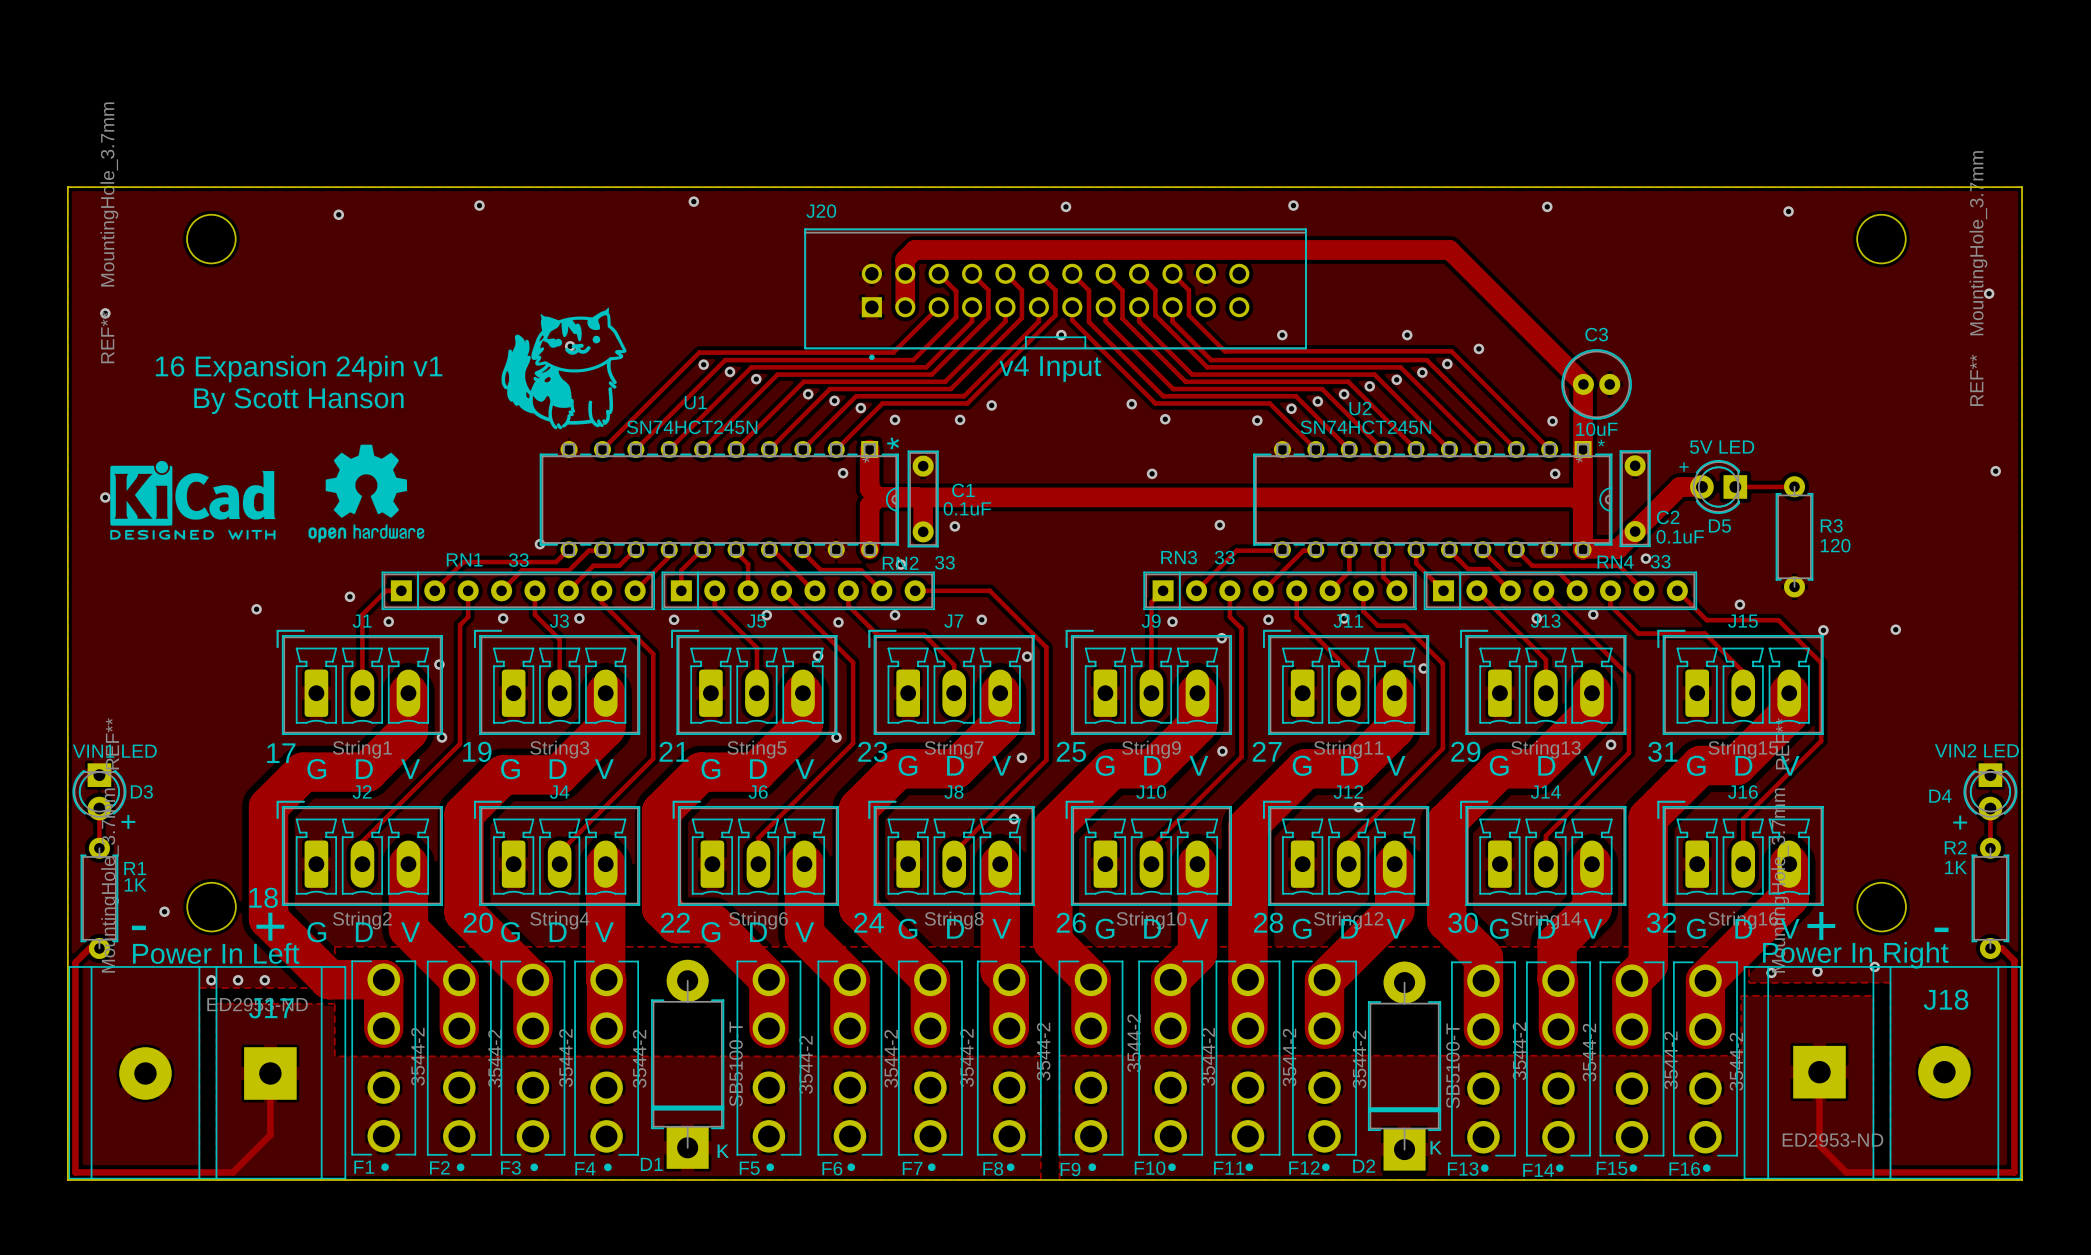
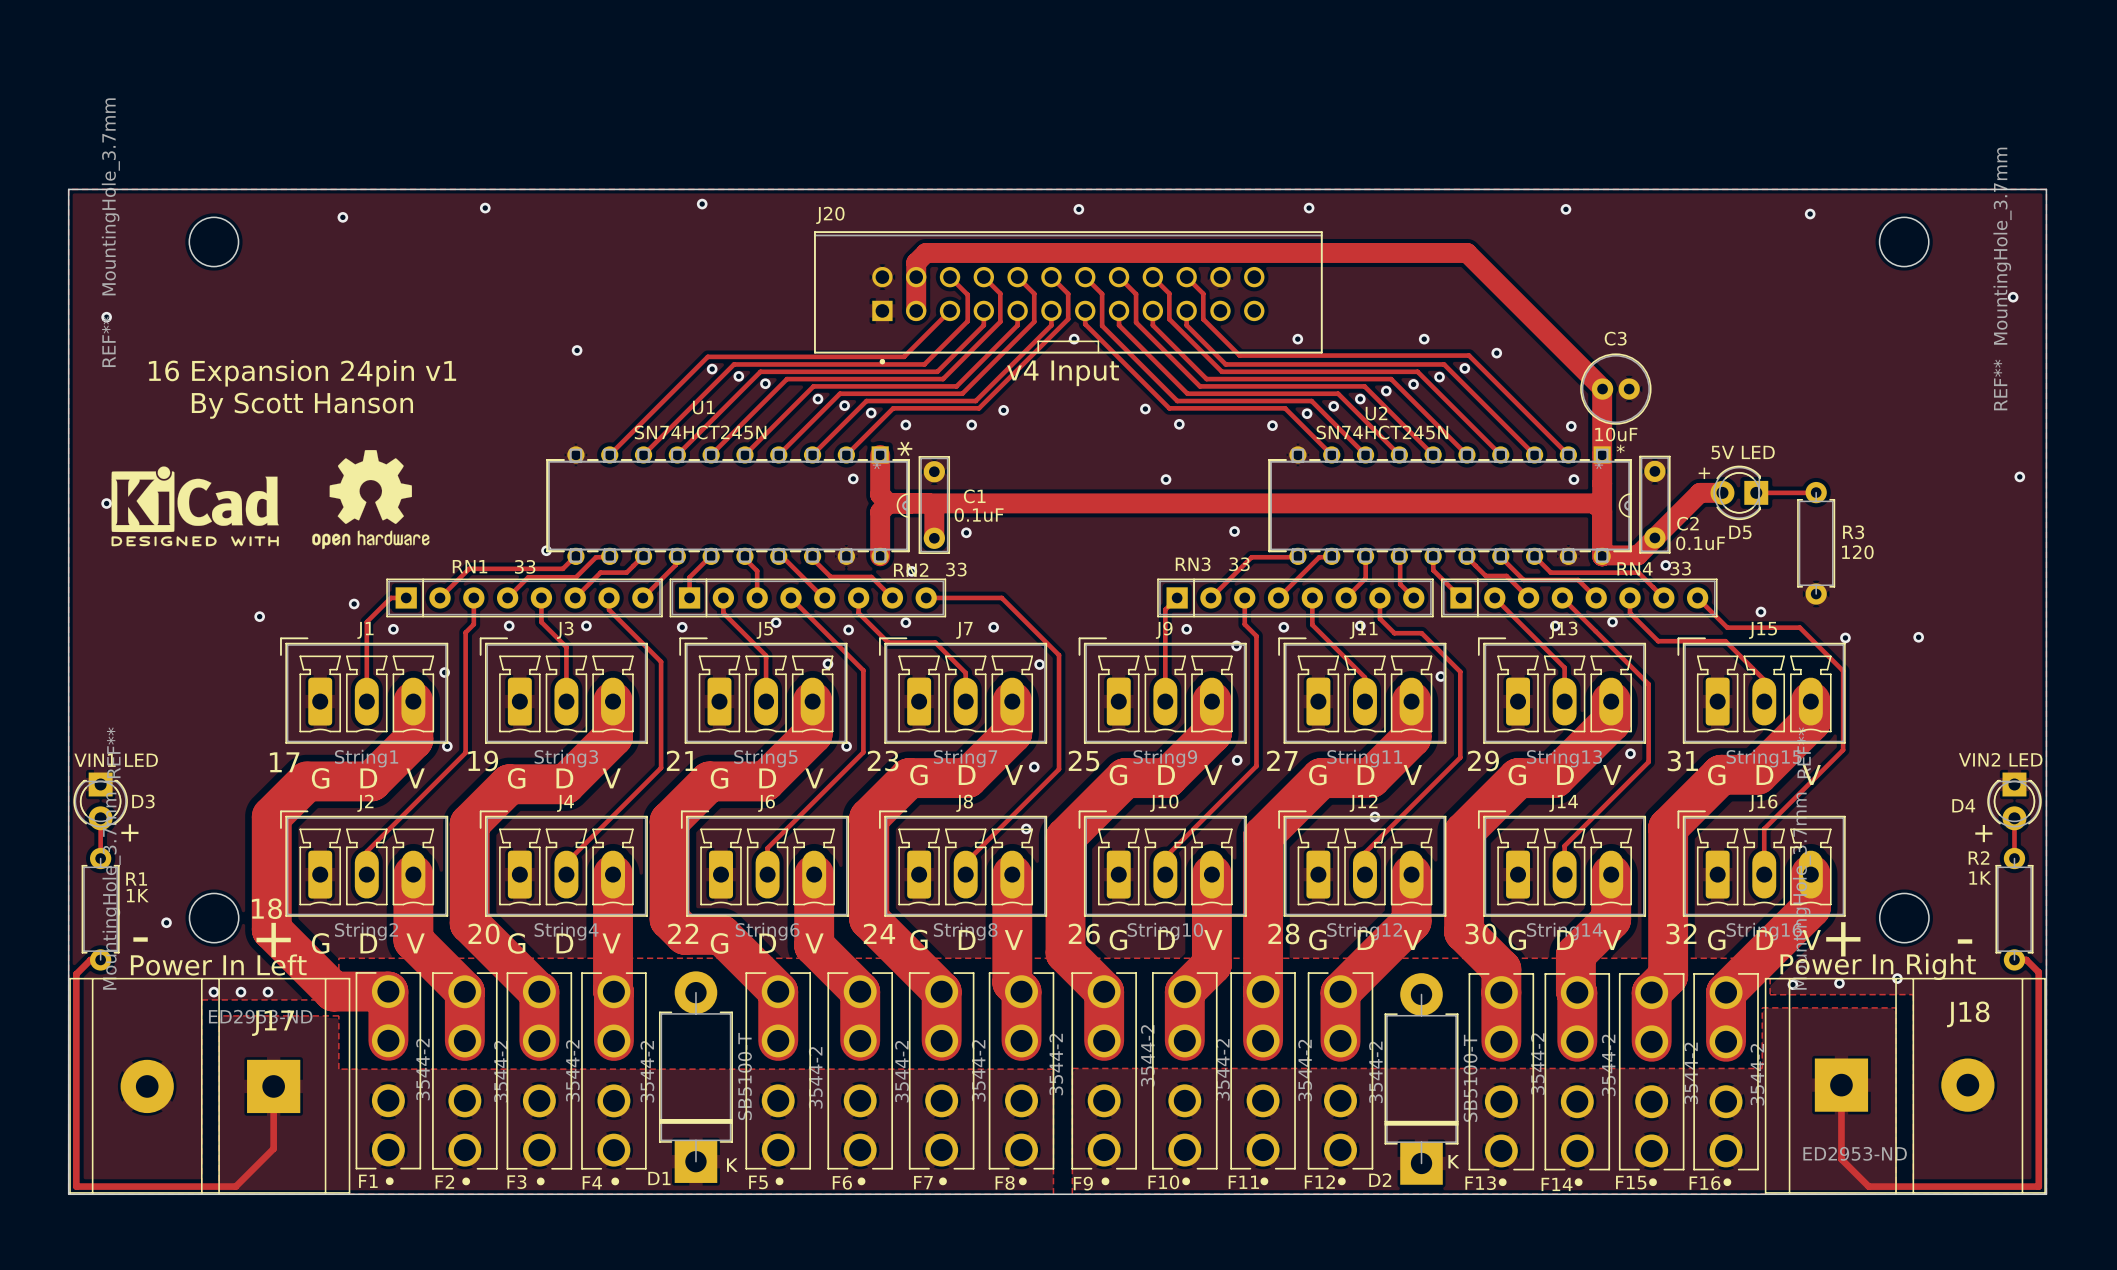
drawing: [501, 307, 627, 430] -> none

